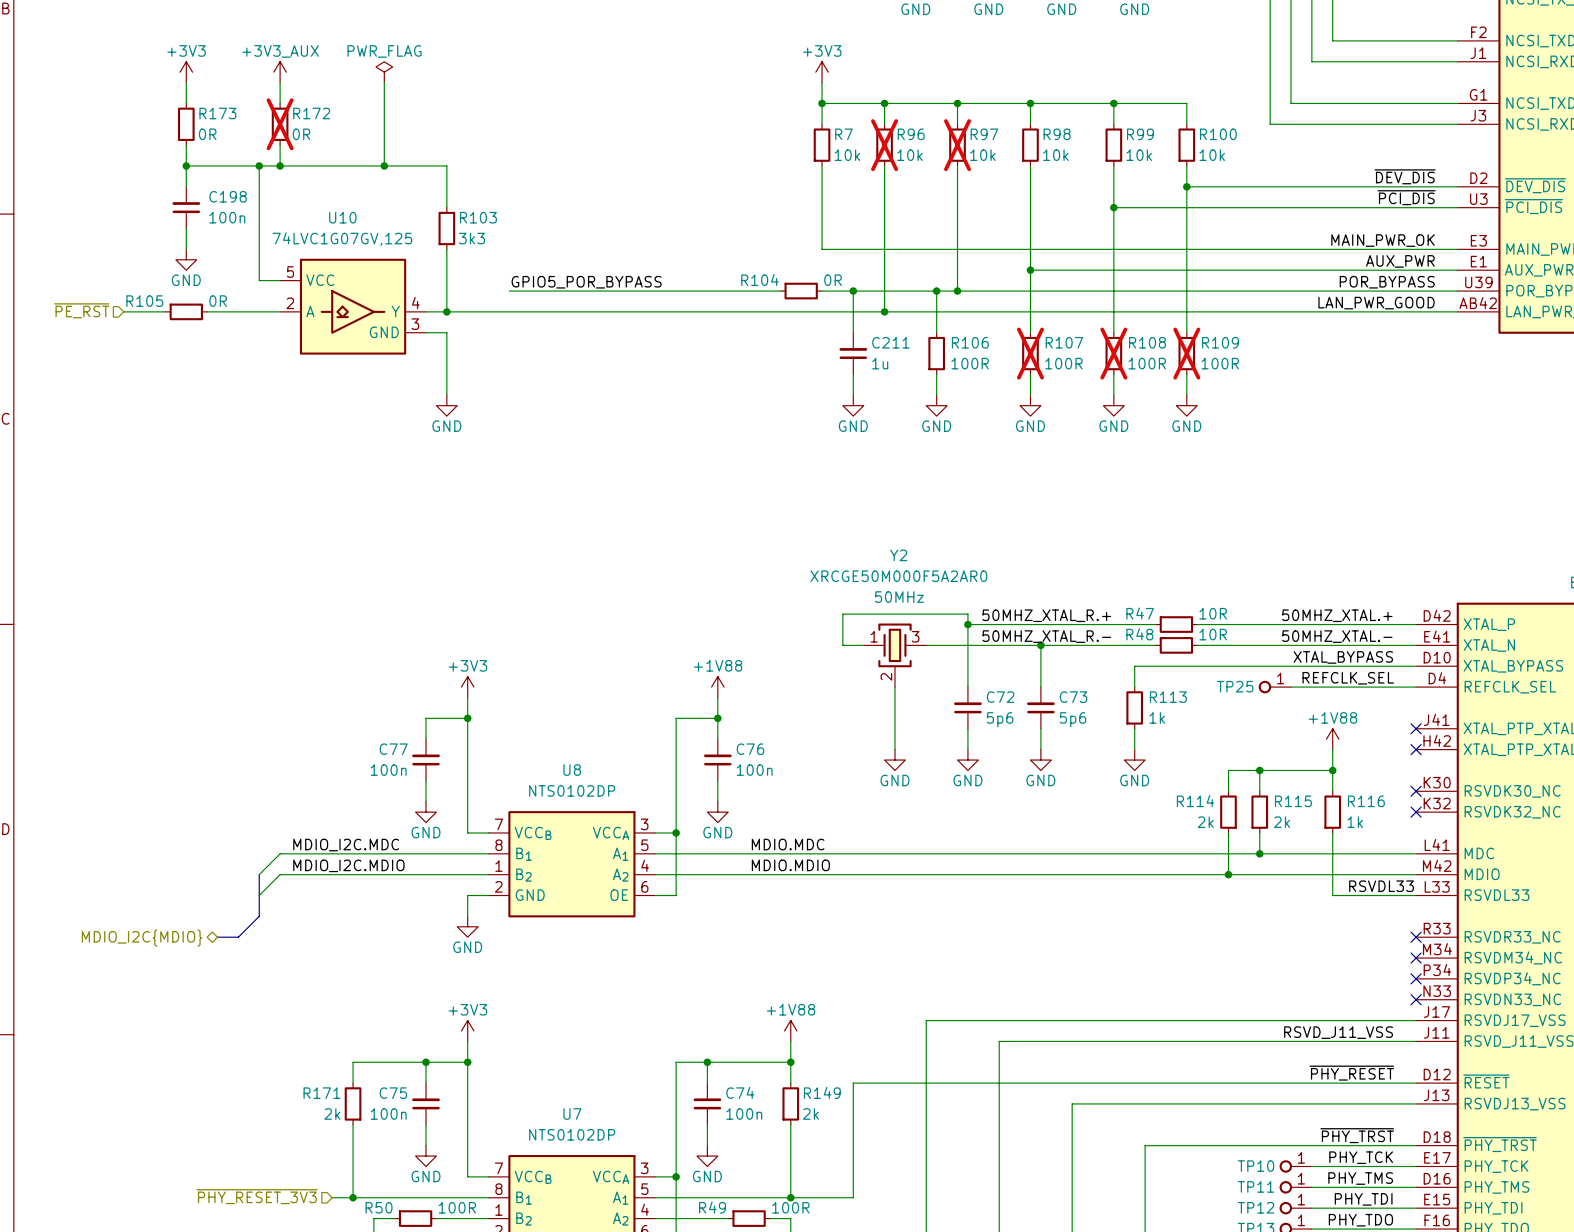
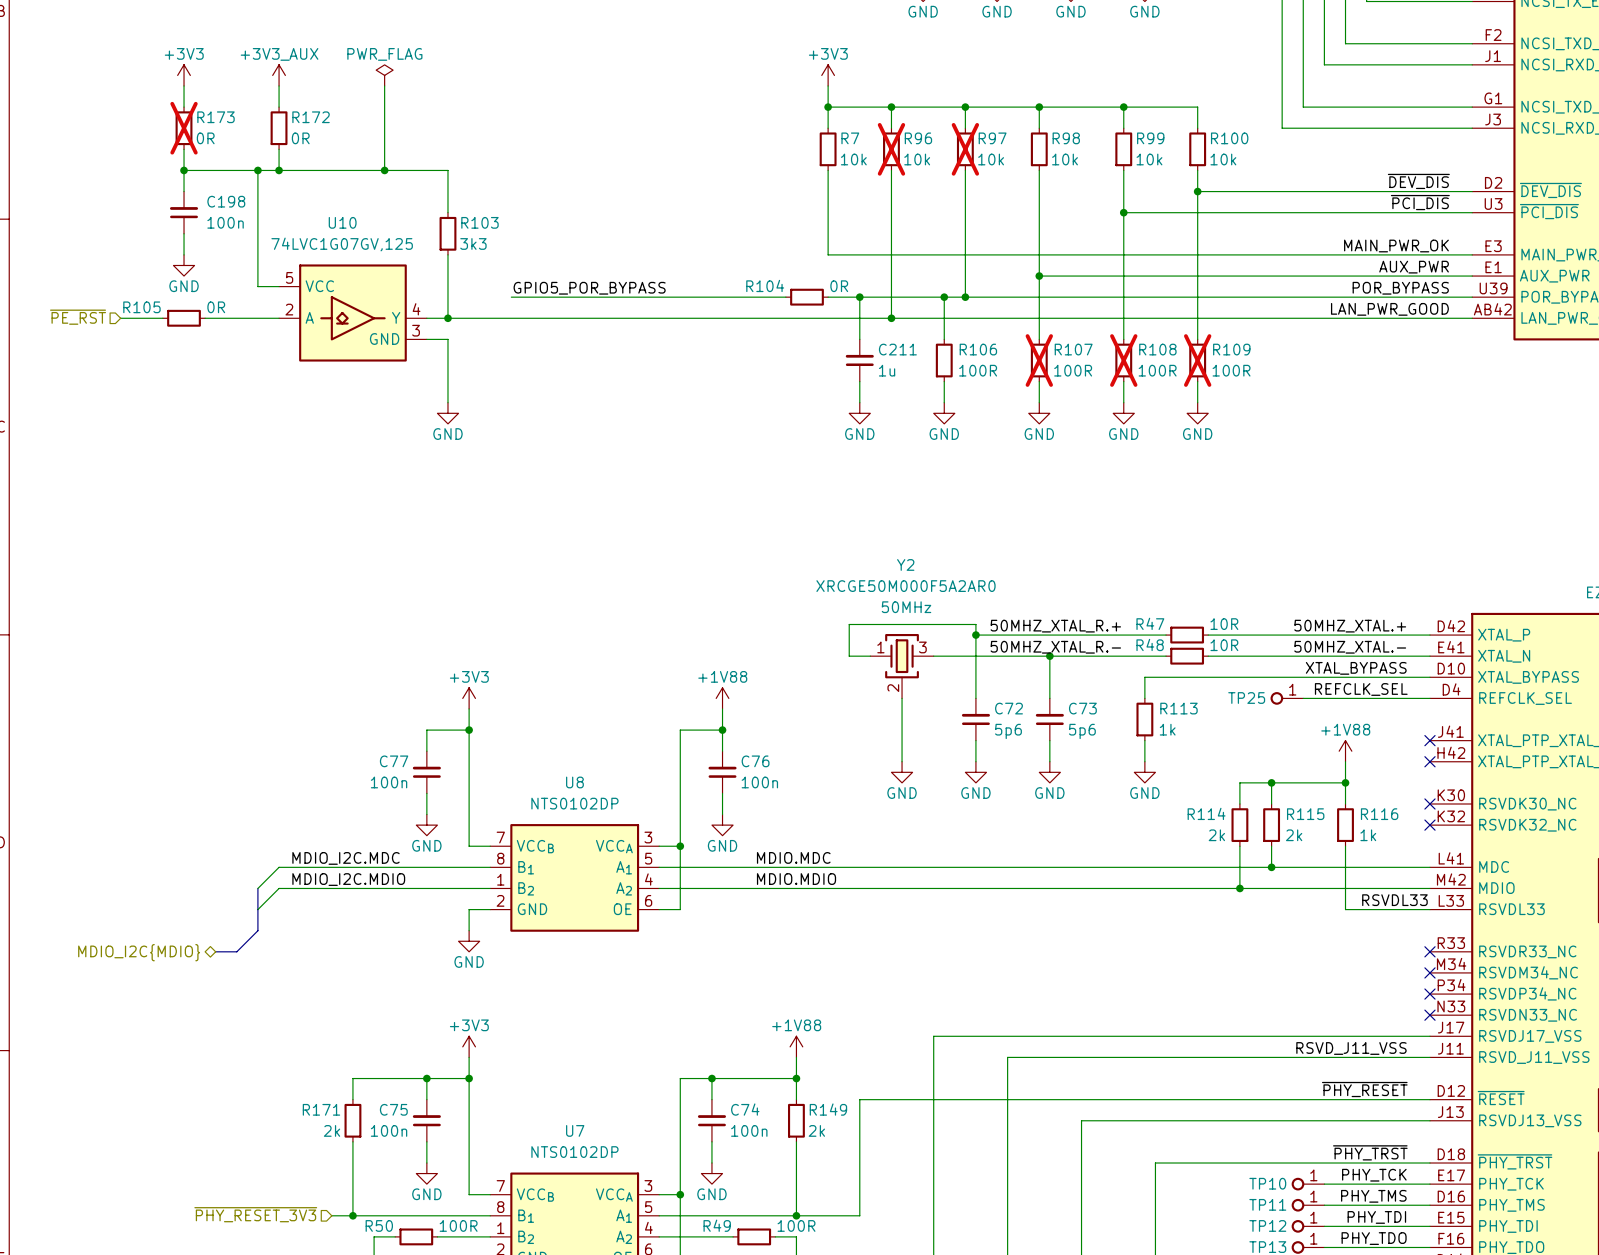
R173 do-not-place cross: none -> (184, 128)
R172 do-not-place cross: (280, 124) -> none

